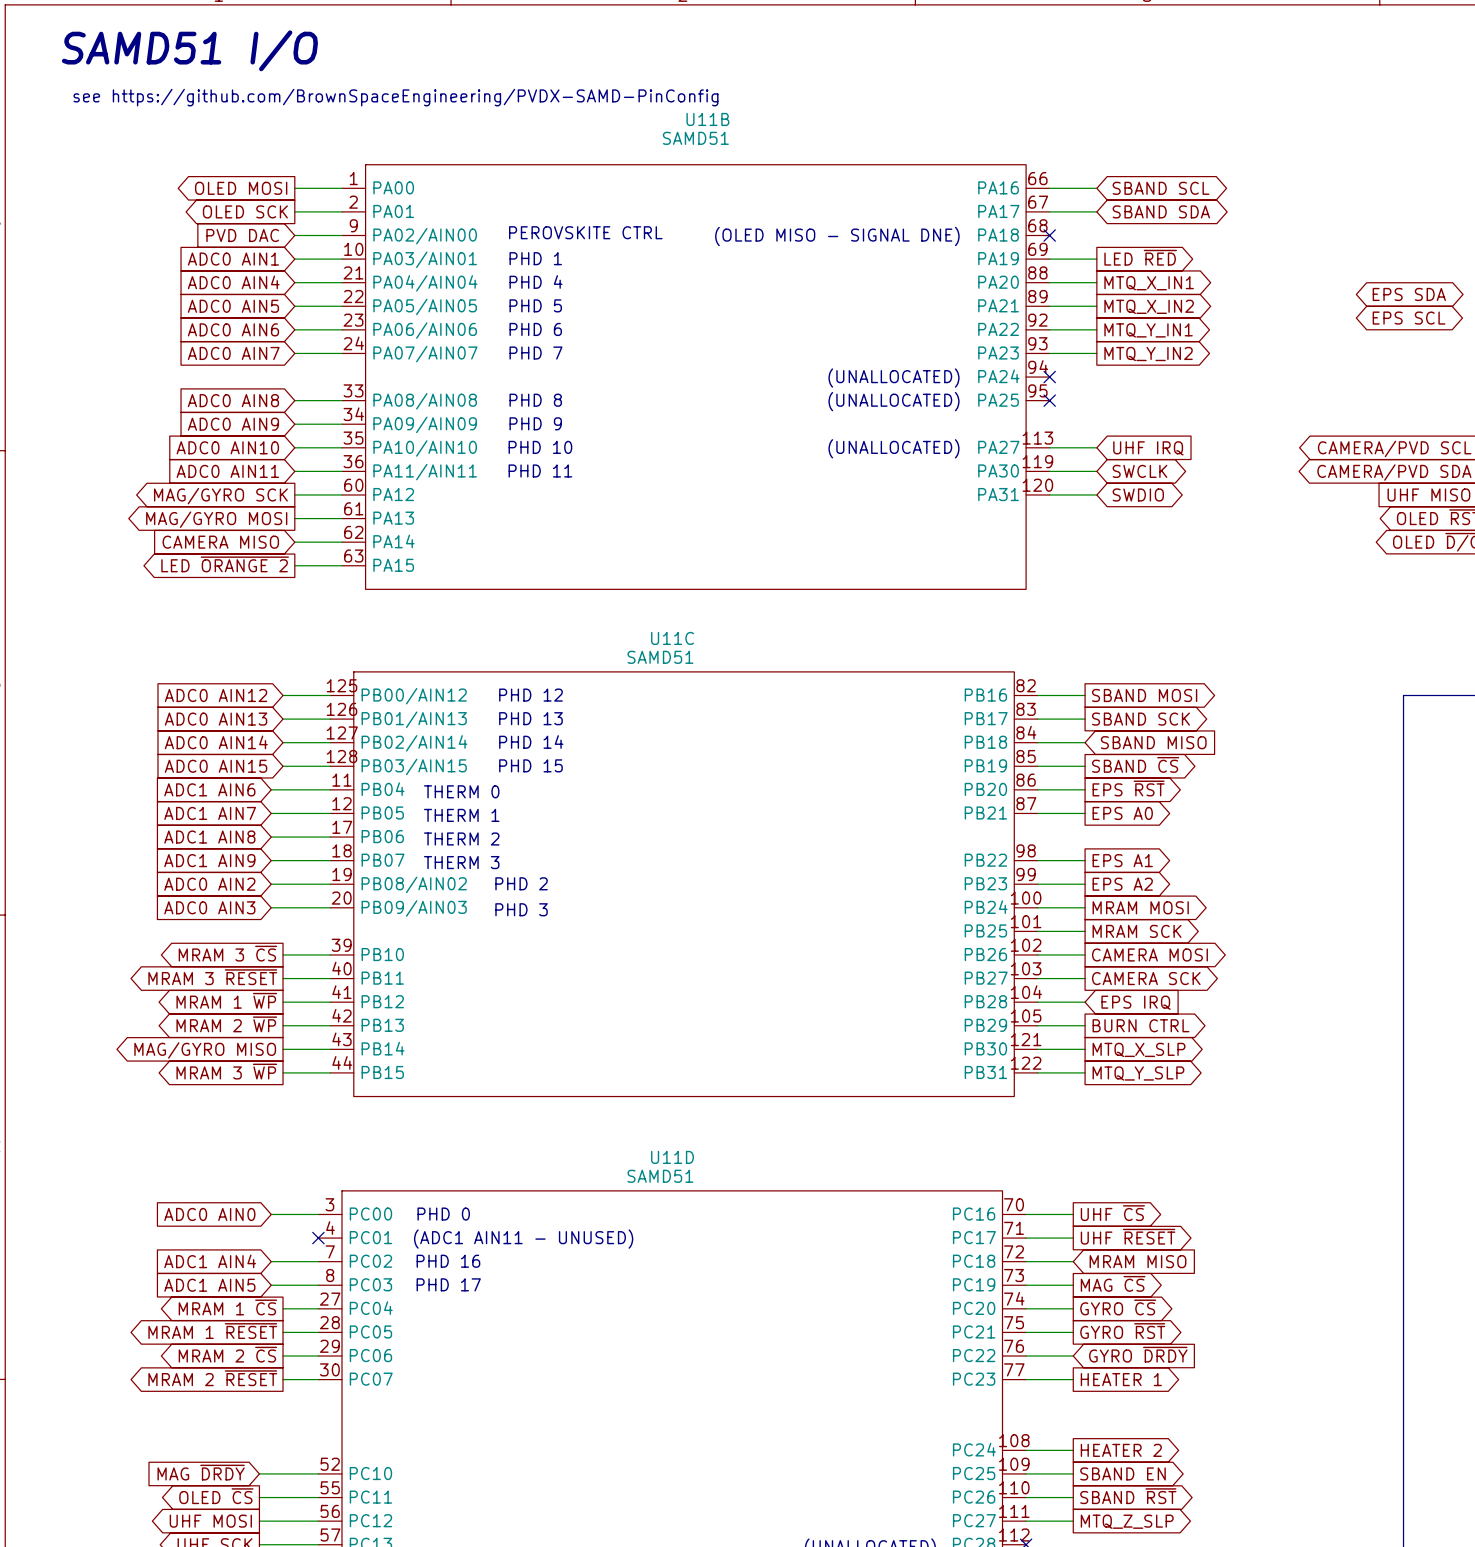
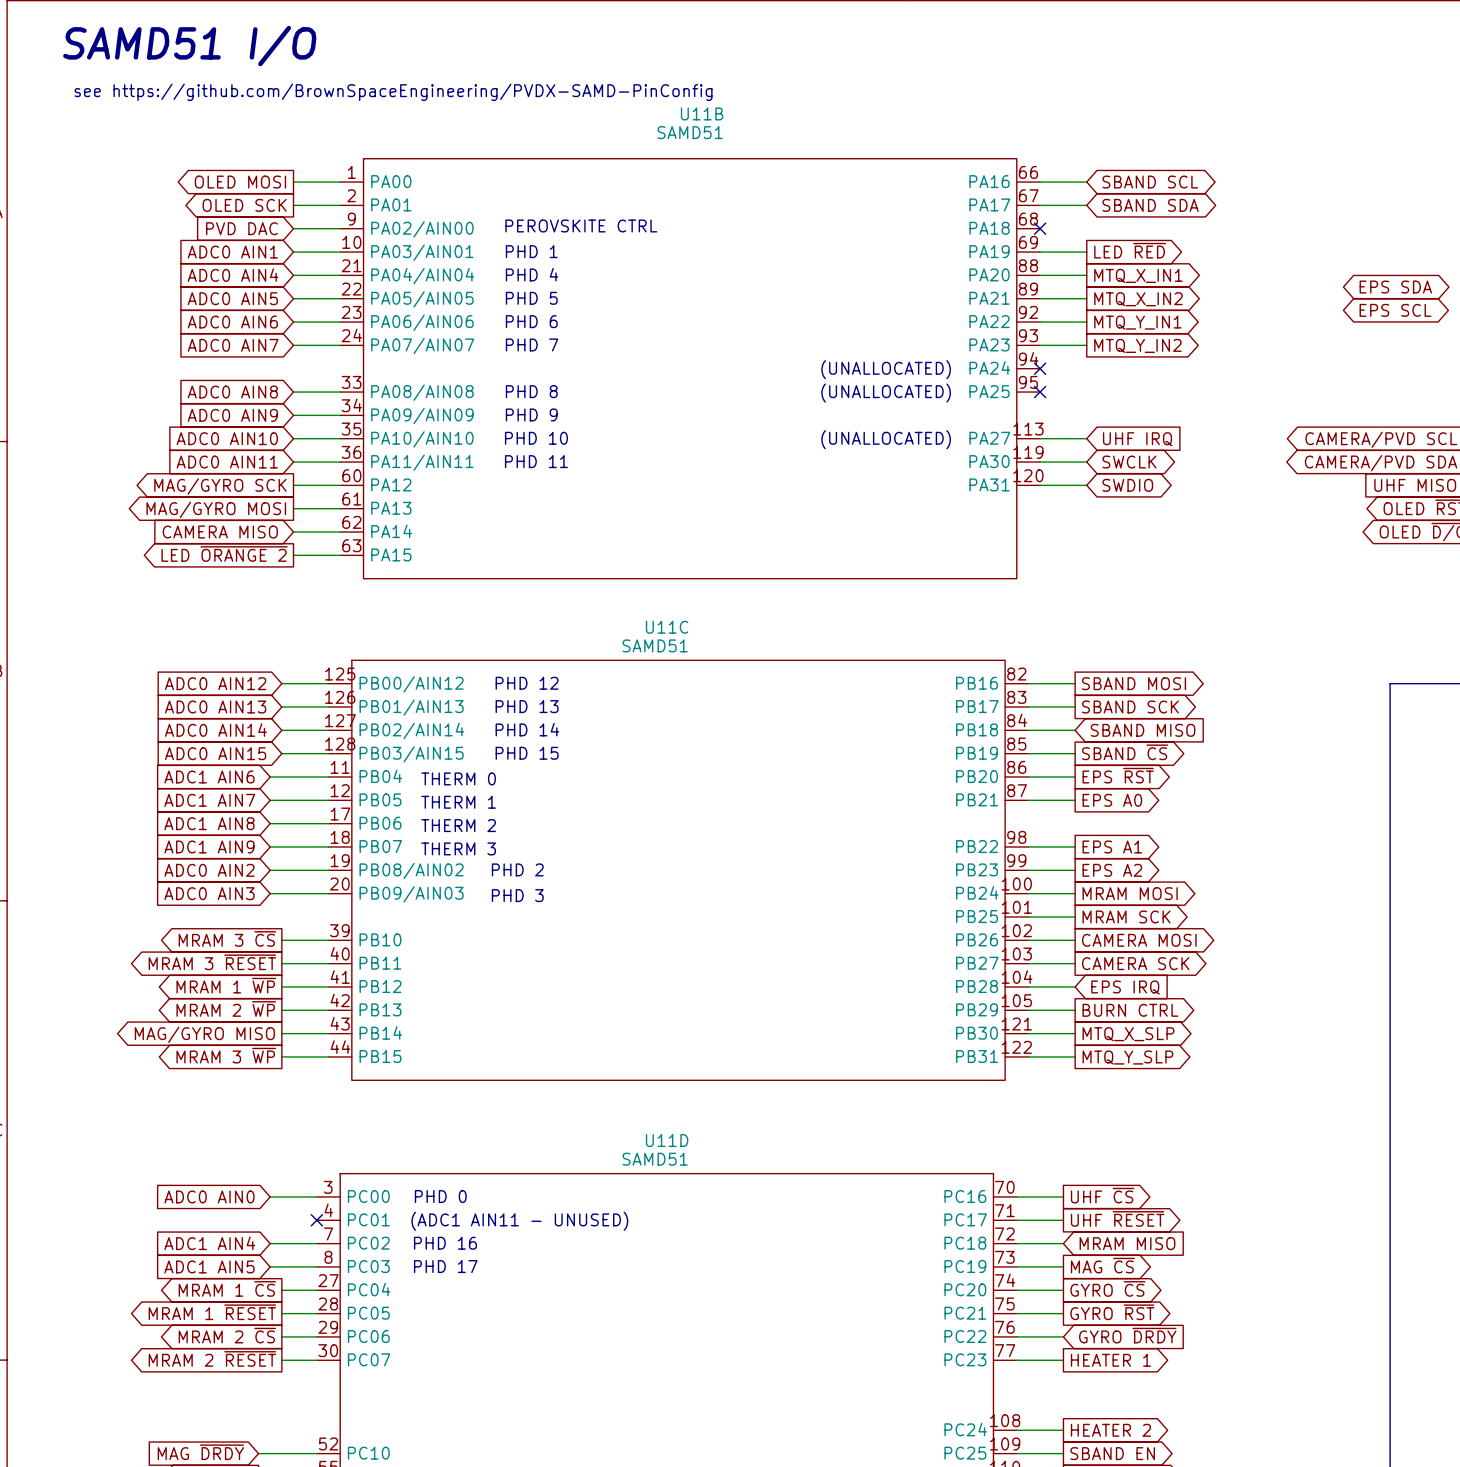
text: (OLED MISO - SIGNAL DNE) (837, 236) -> none

